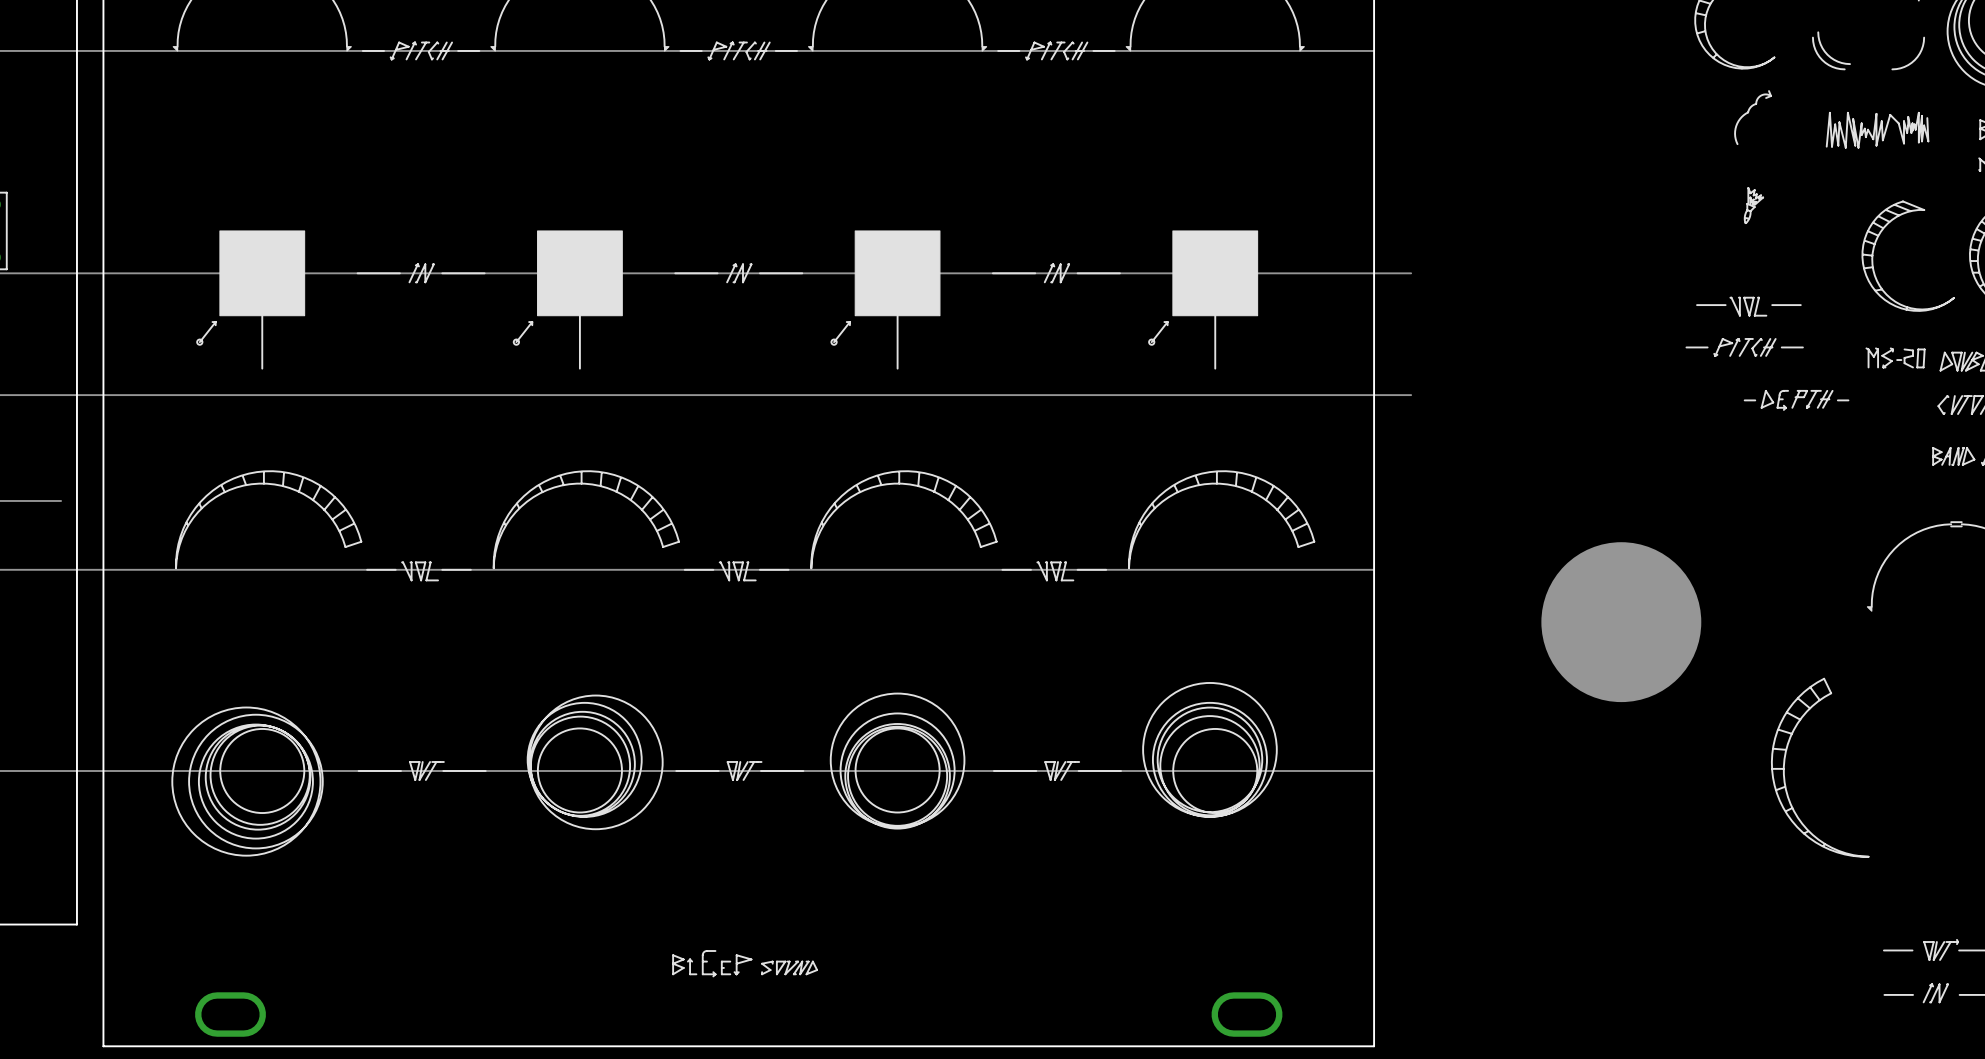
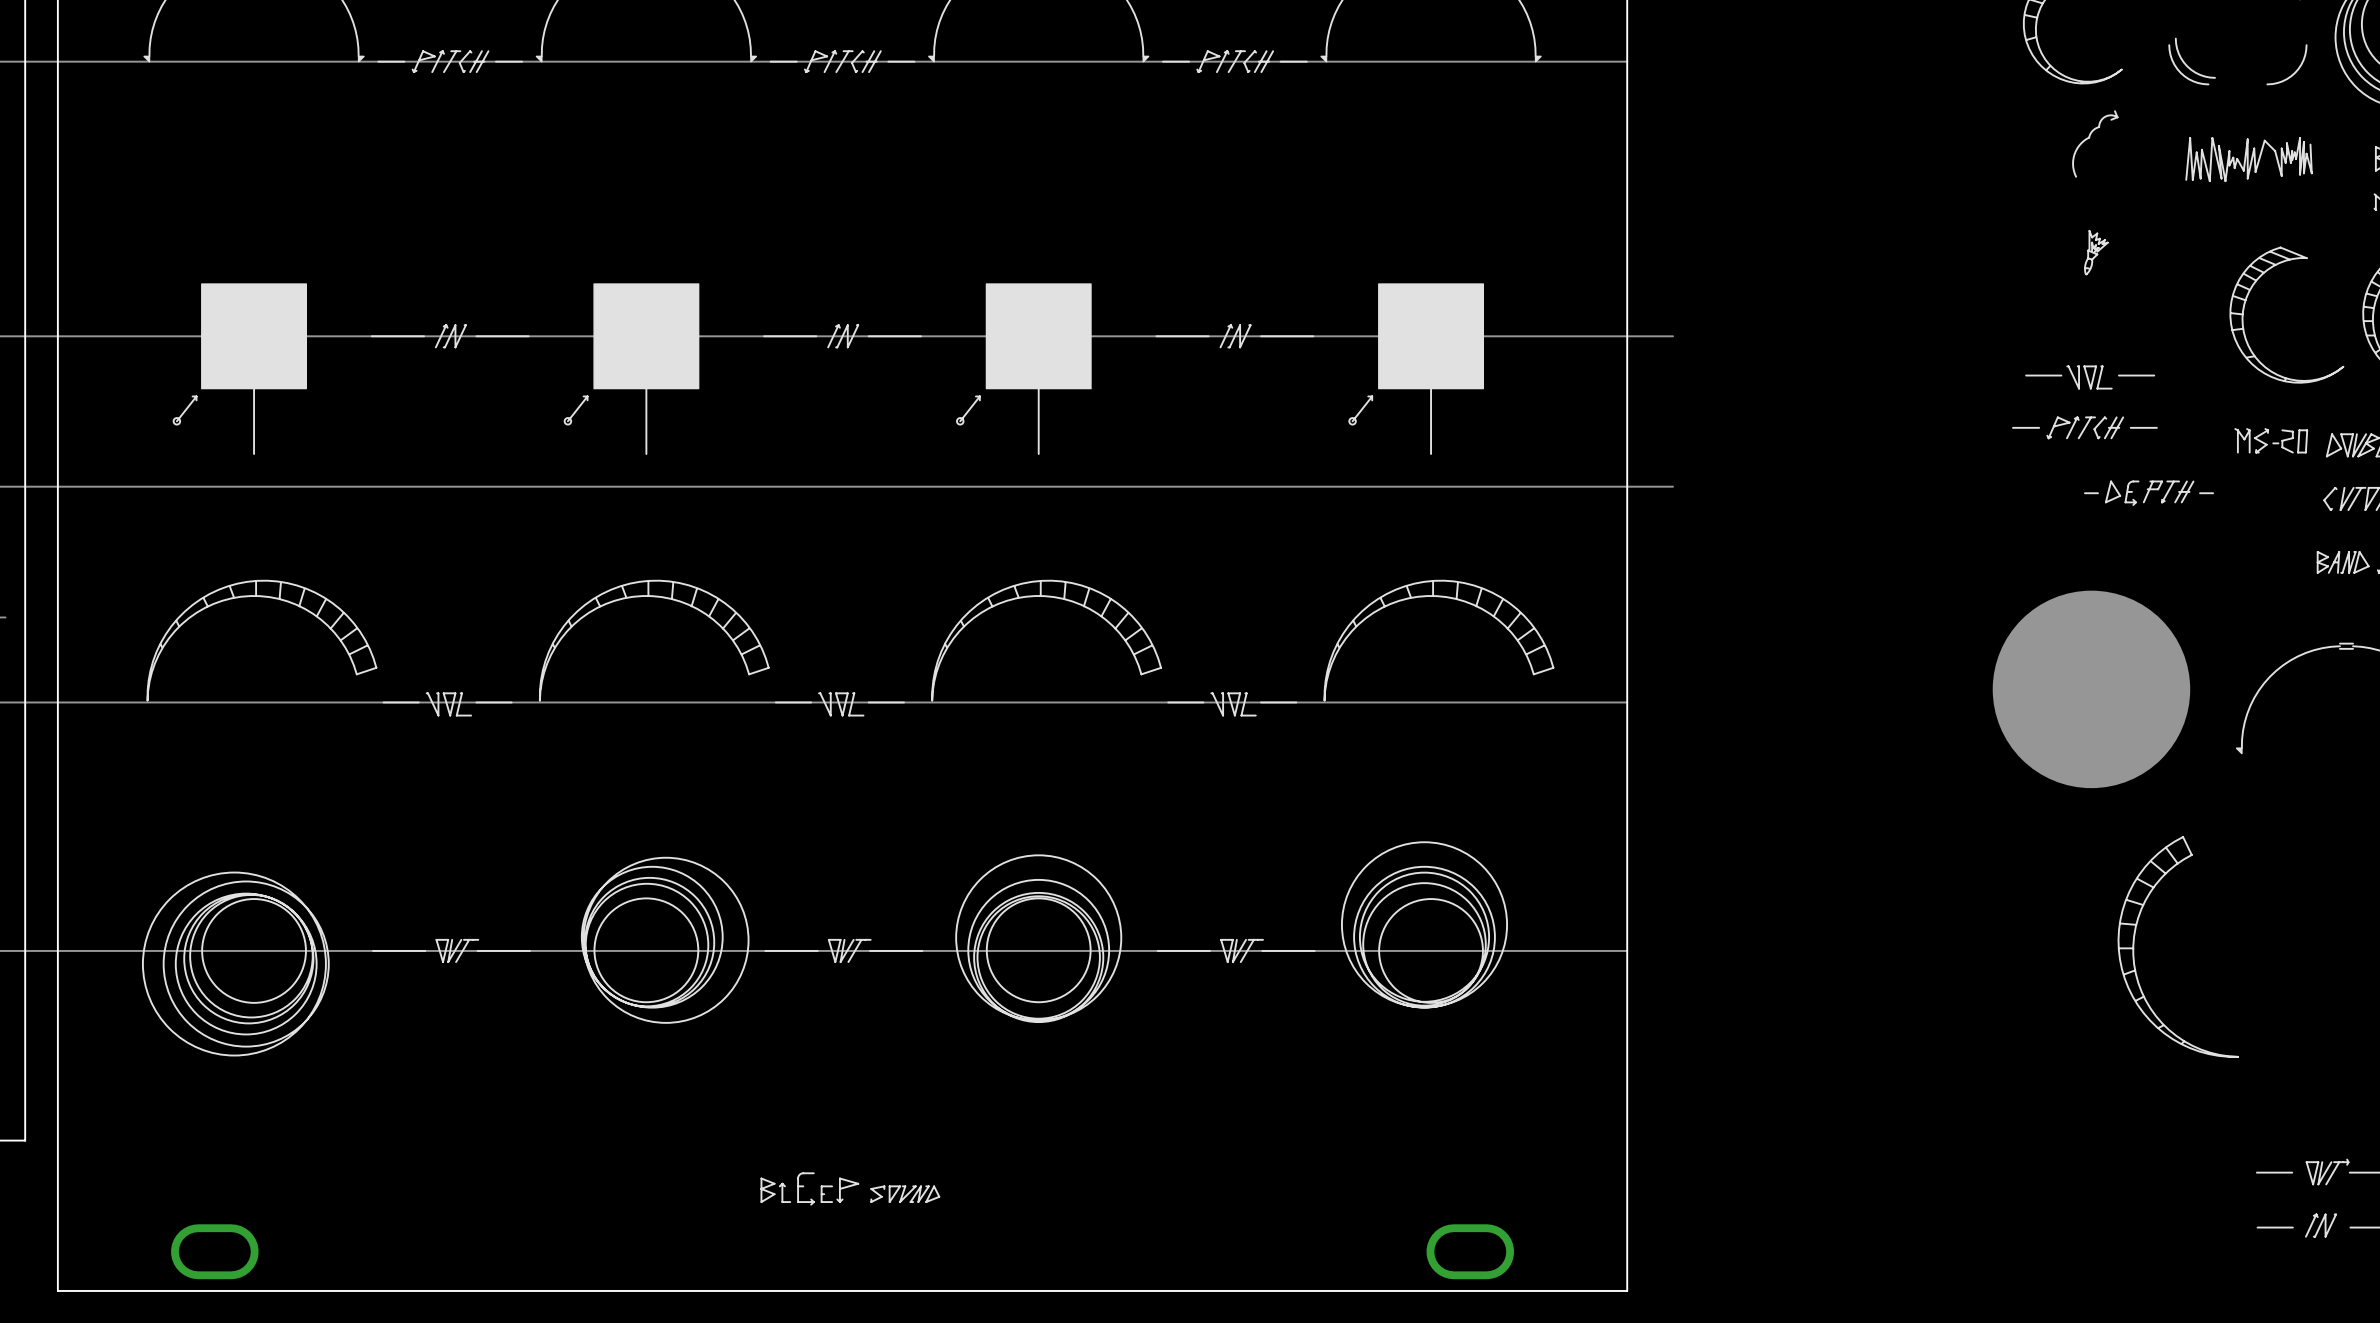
drawing position: (1621, 622) -> (2091, 689)

